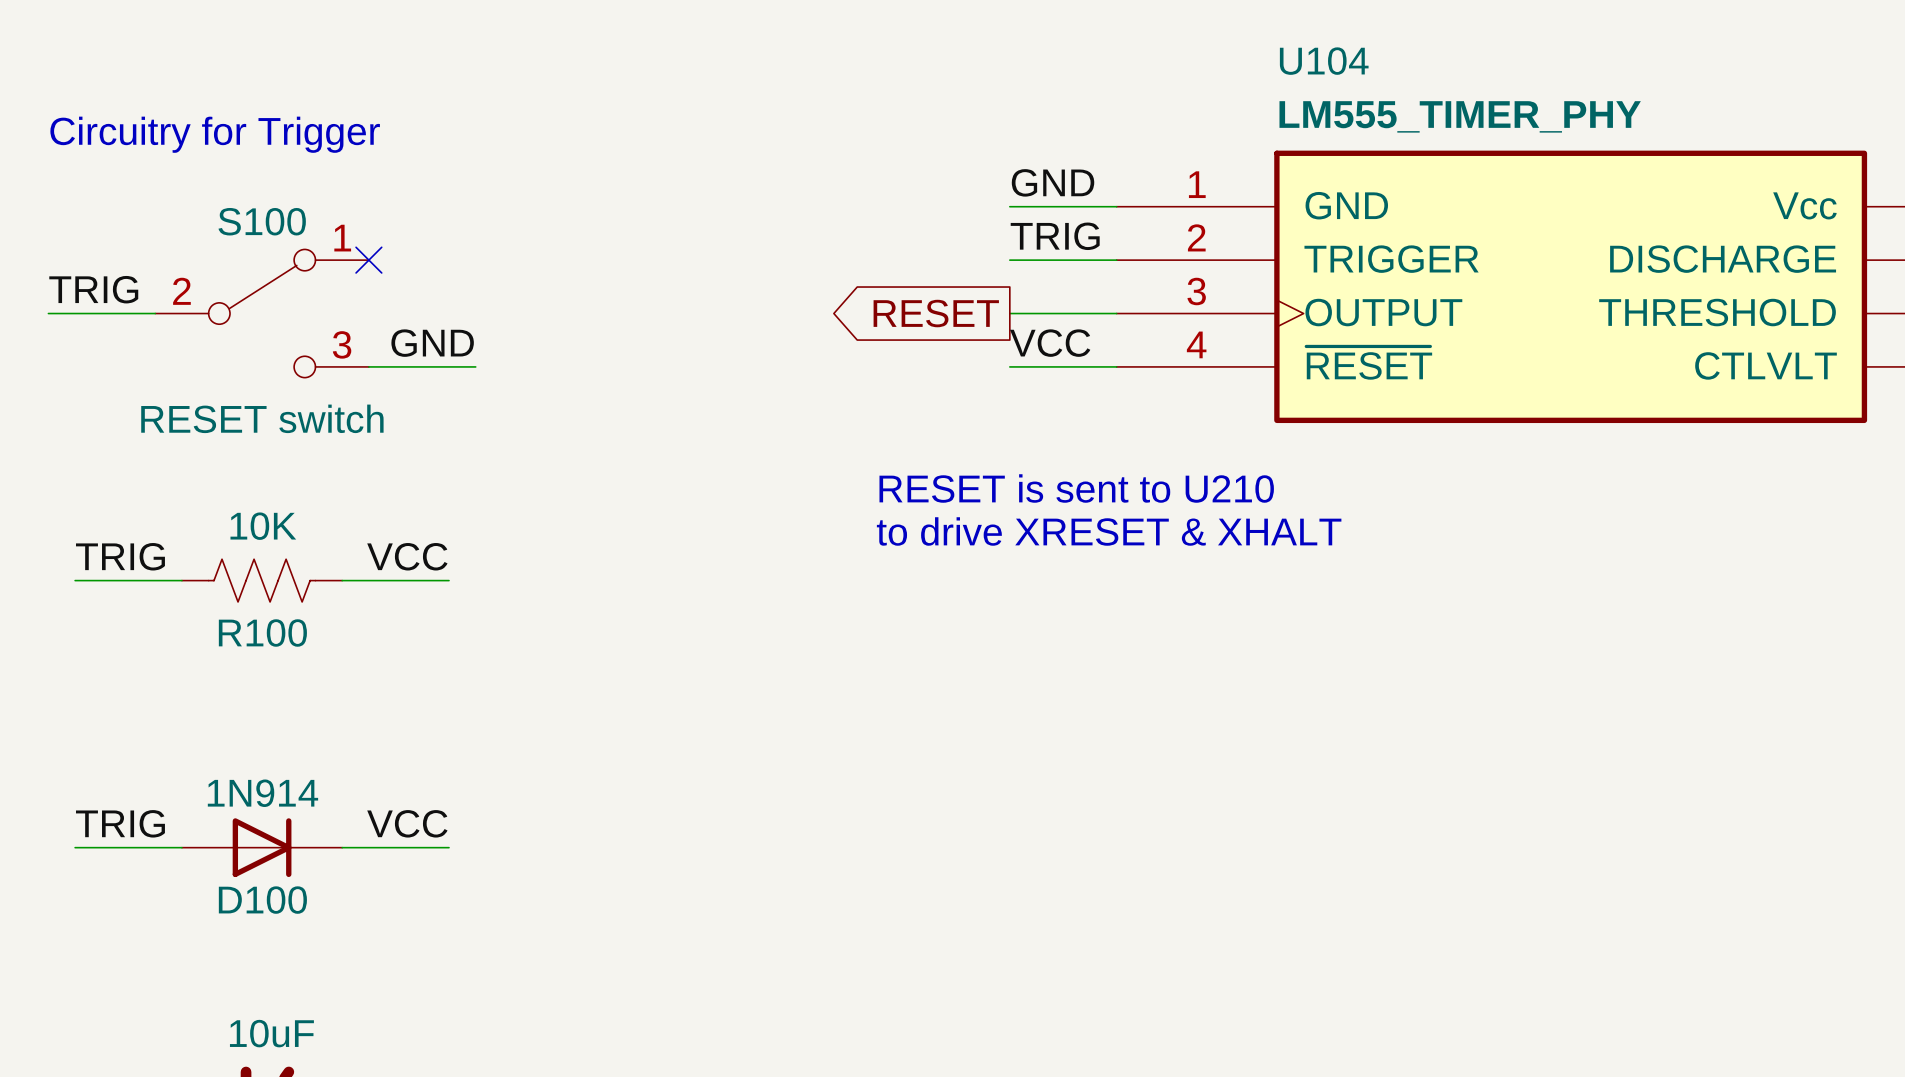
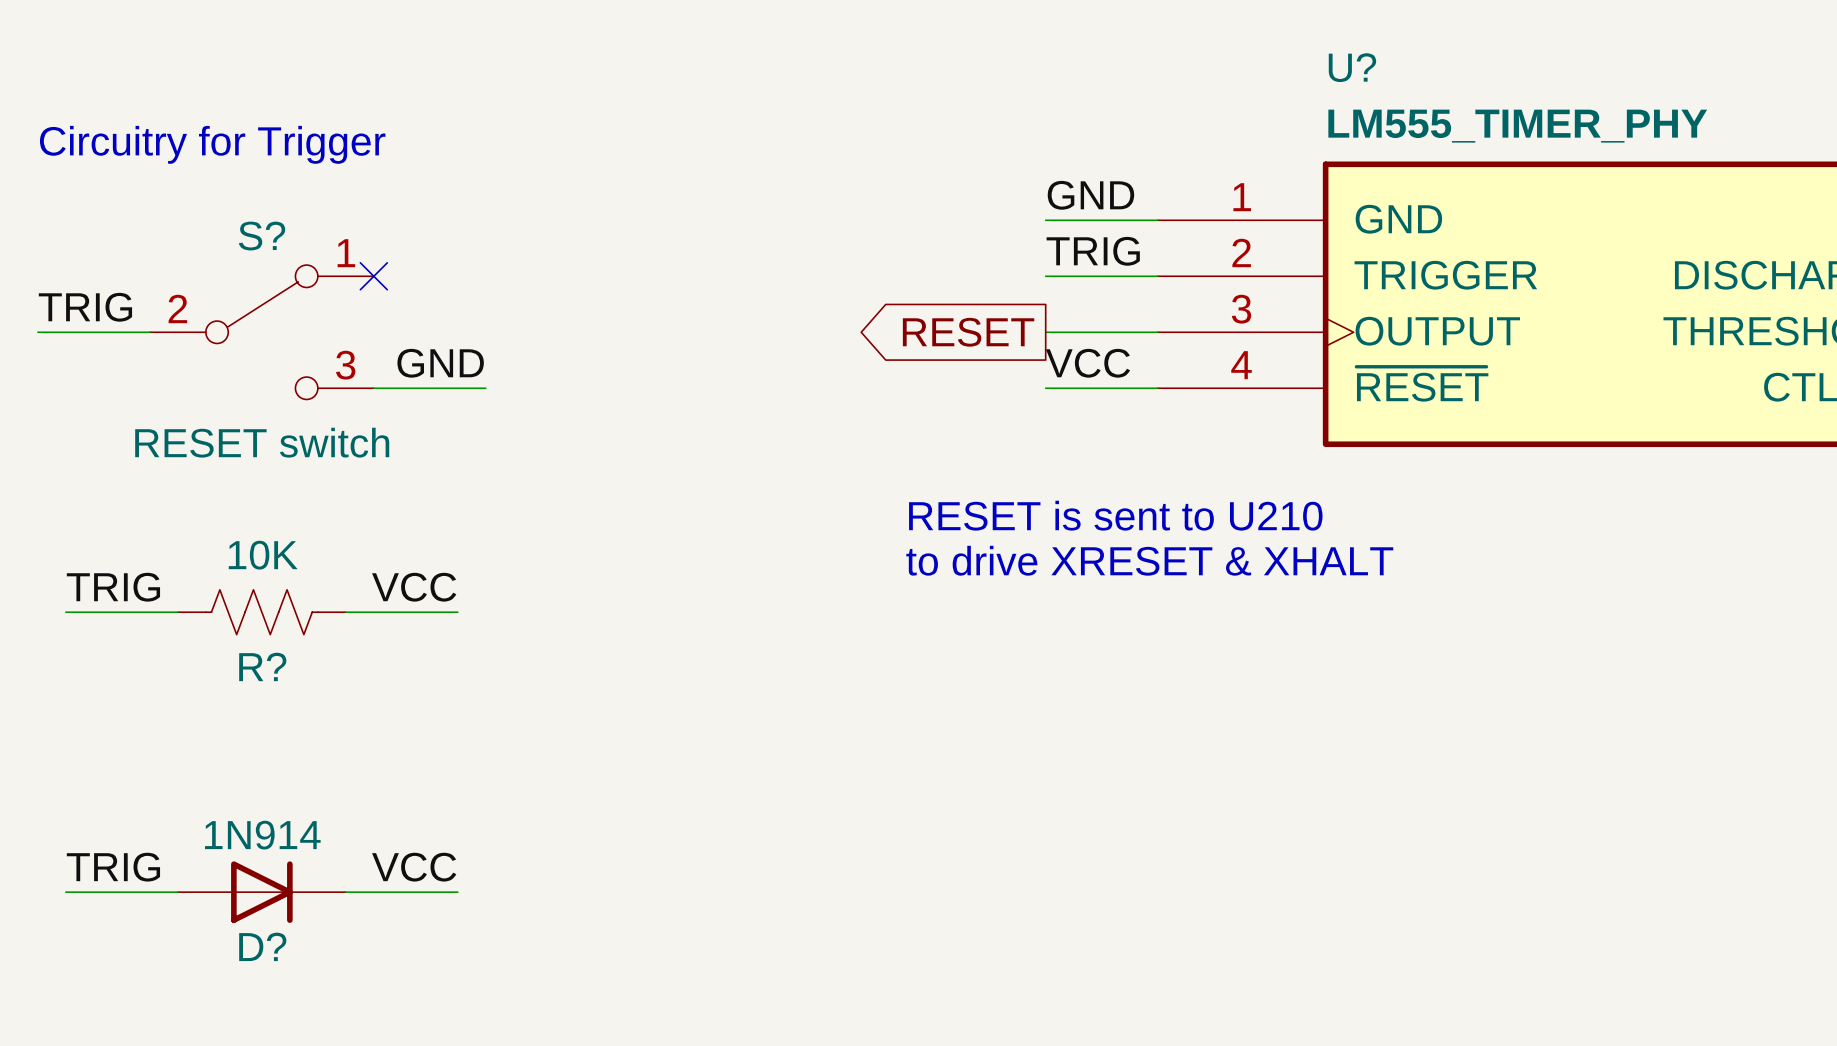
U104 name: U104 (1324, 61) -> U? (1352, 67)
S100 name: S100 (262, 221) -> S? (262, 236)
R100 name: R100 (262, 633) -> R? (262, 666)
D100 name: D100 (262, 900) -> D? (262, 946)

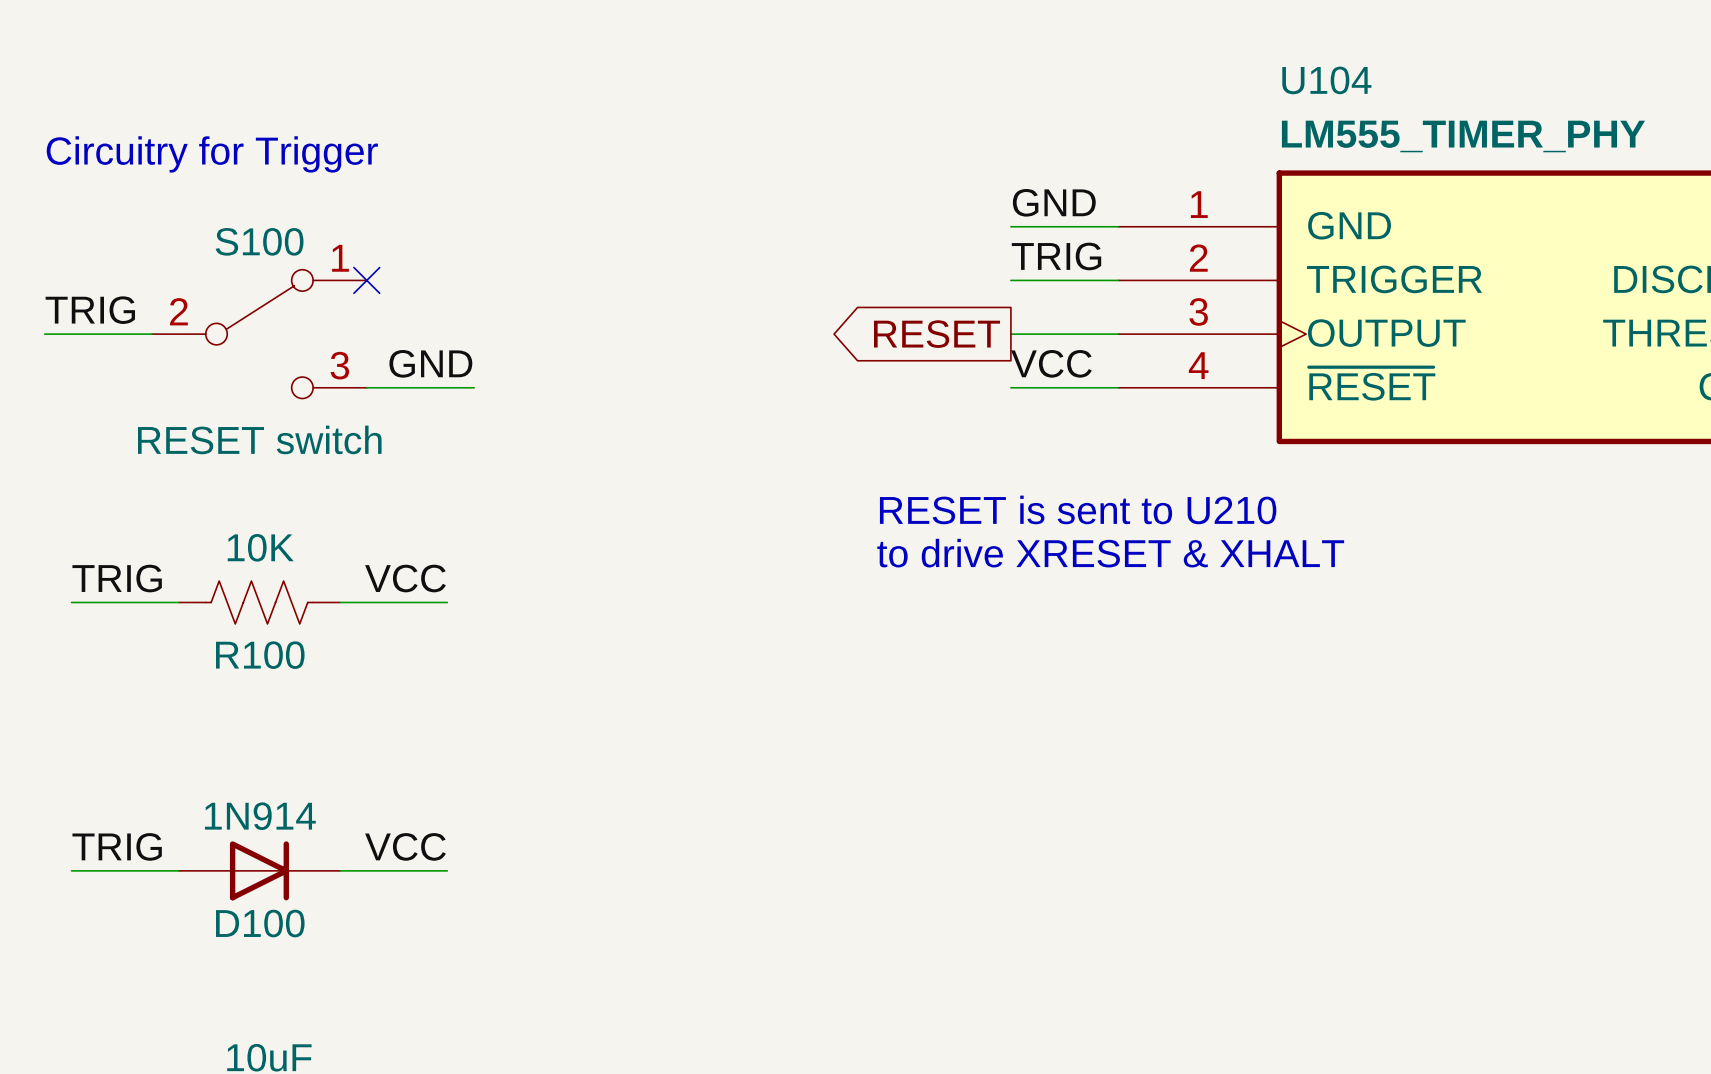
U? name: U? (1352, 67) -> U104 (1326, 80)
S? name: S? (262, 236) -> S100 (259, 241)
R? name: R? (262, 666) -> R100 (260, 655)
D? name: D? (262, 946) -> D100 (260, 923)

